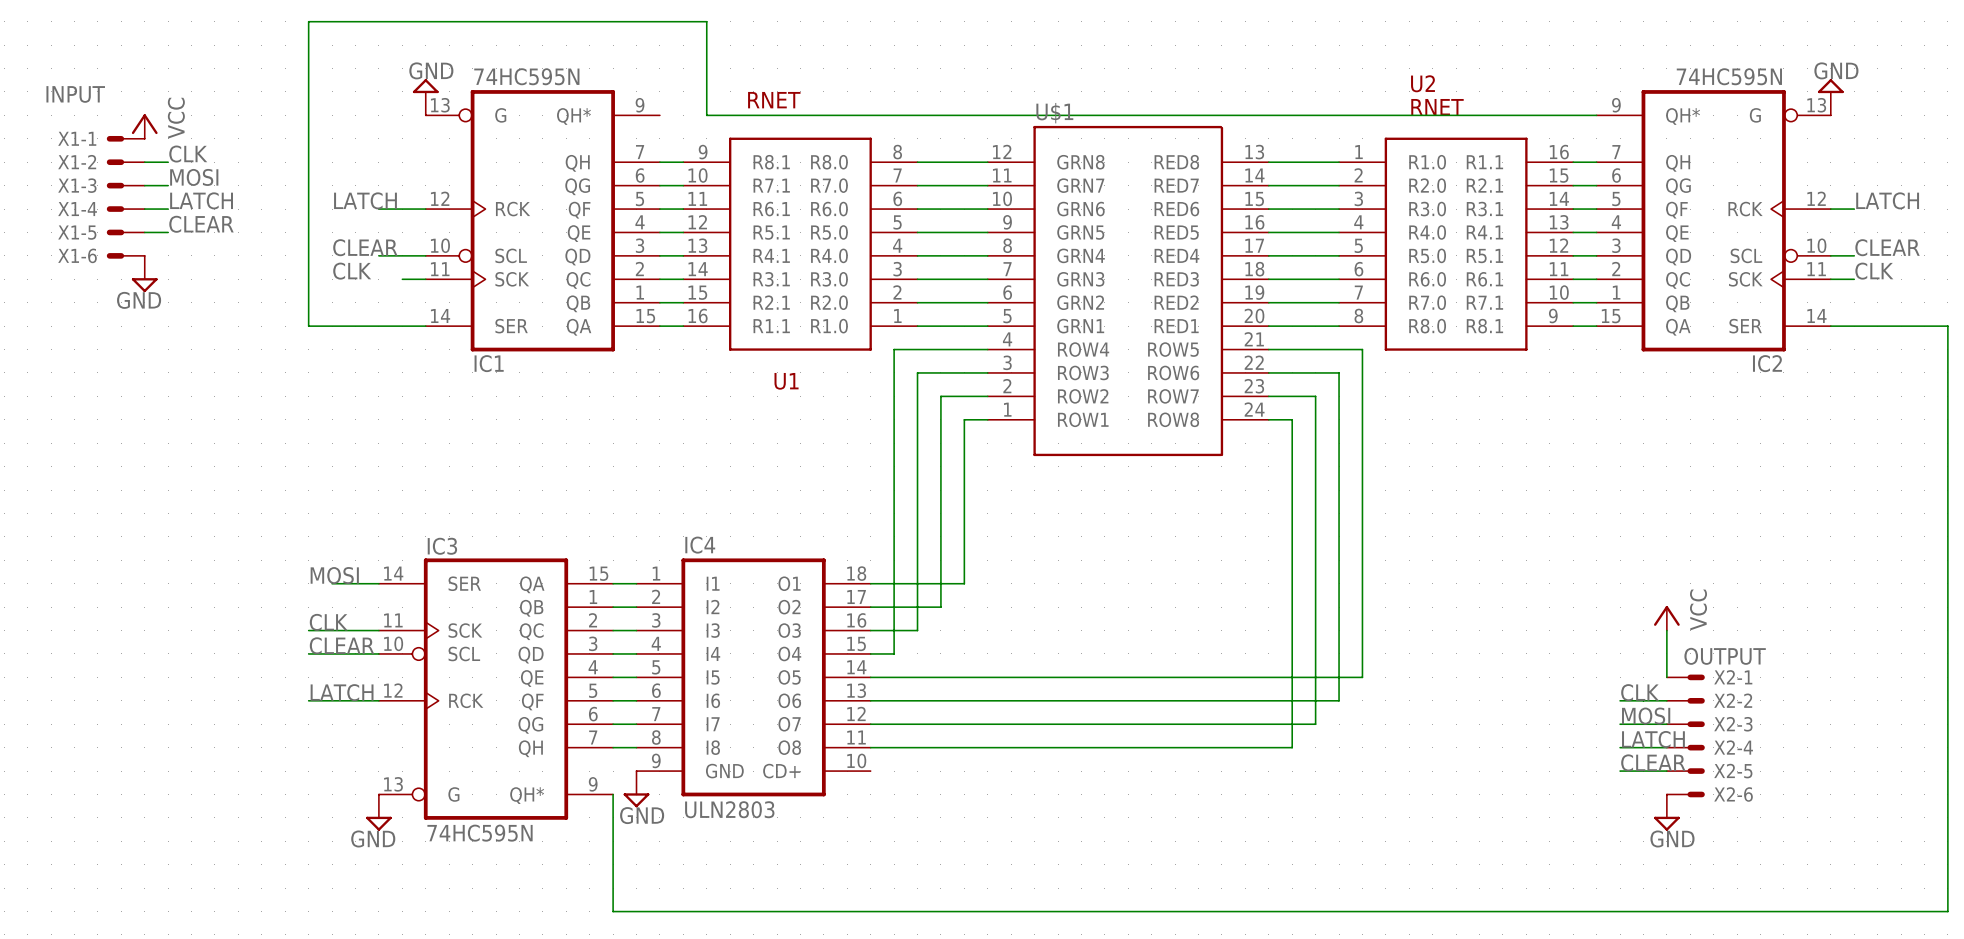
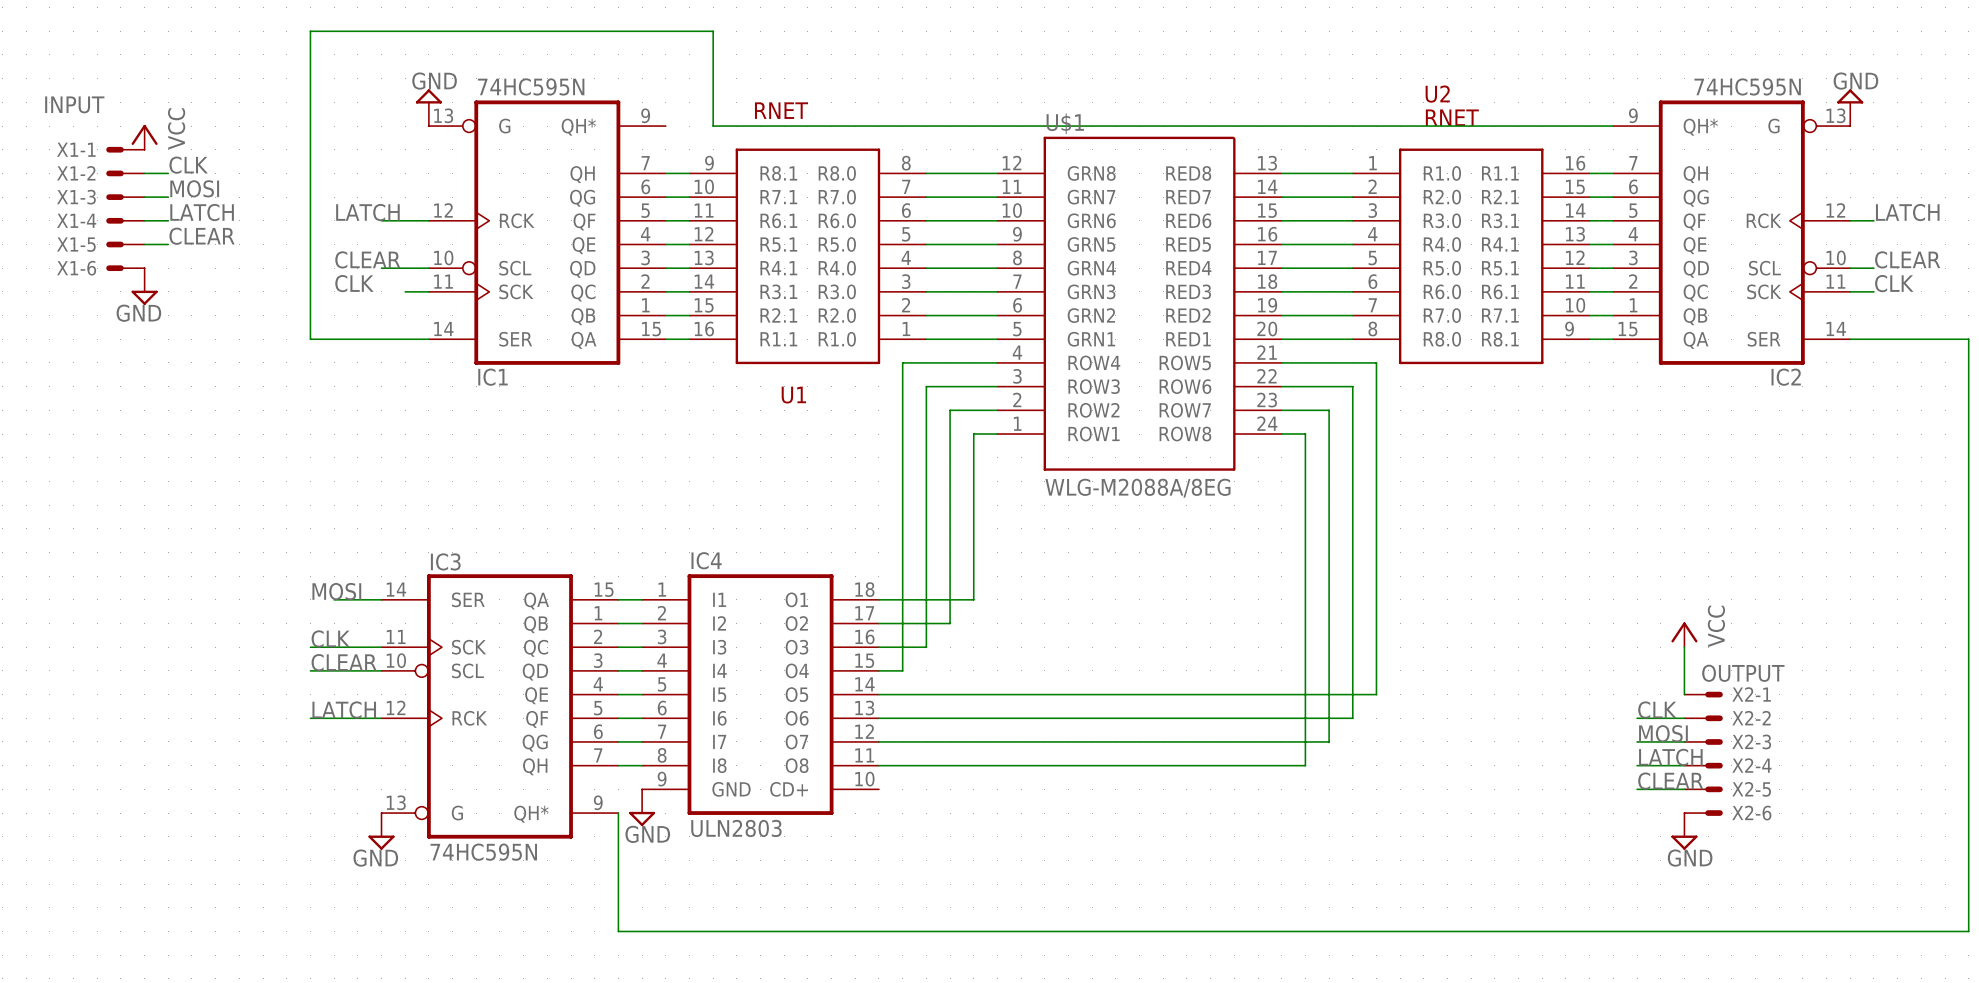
U$1 value: none -> WLG-M2088A/8EG (1138, 488)

